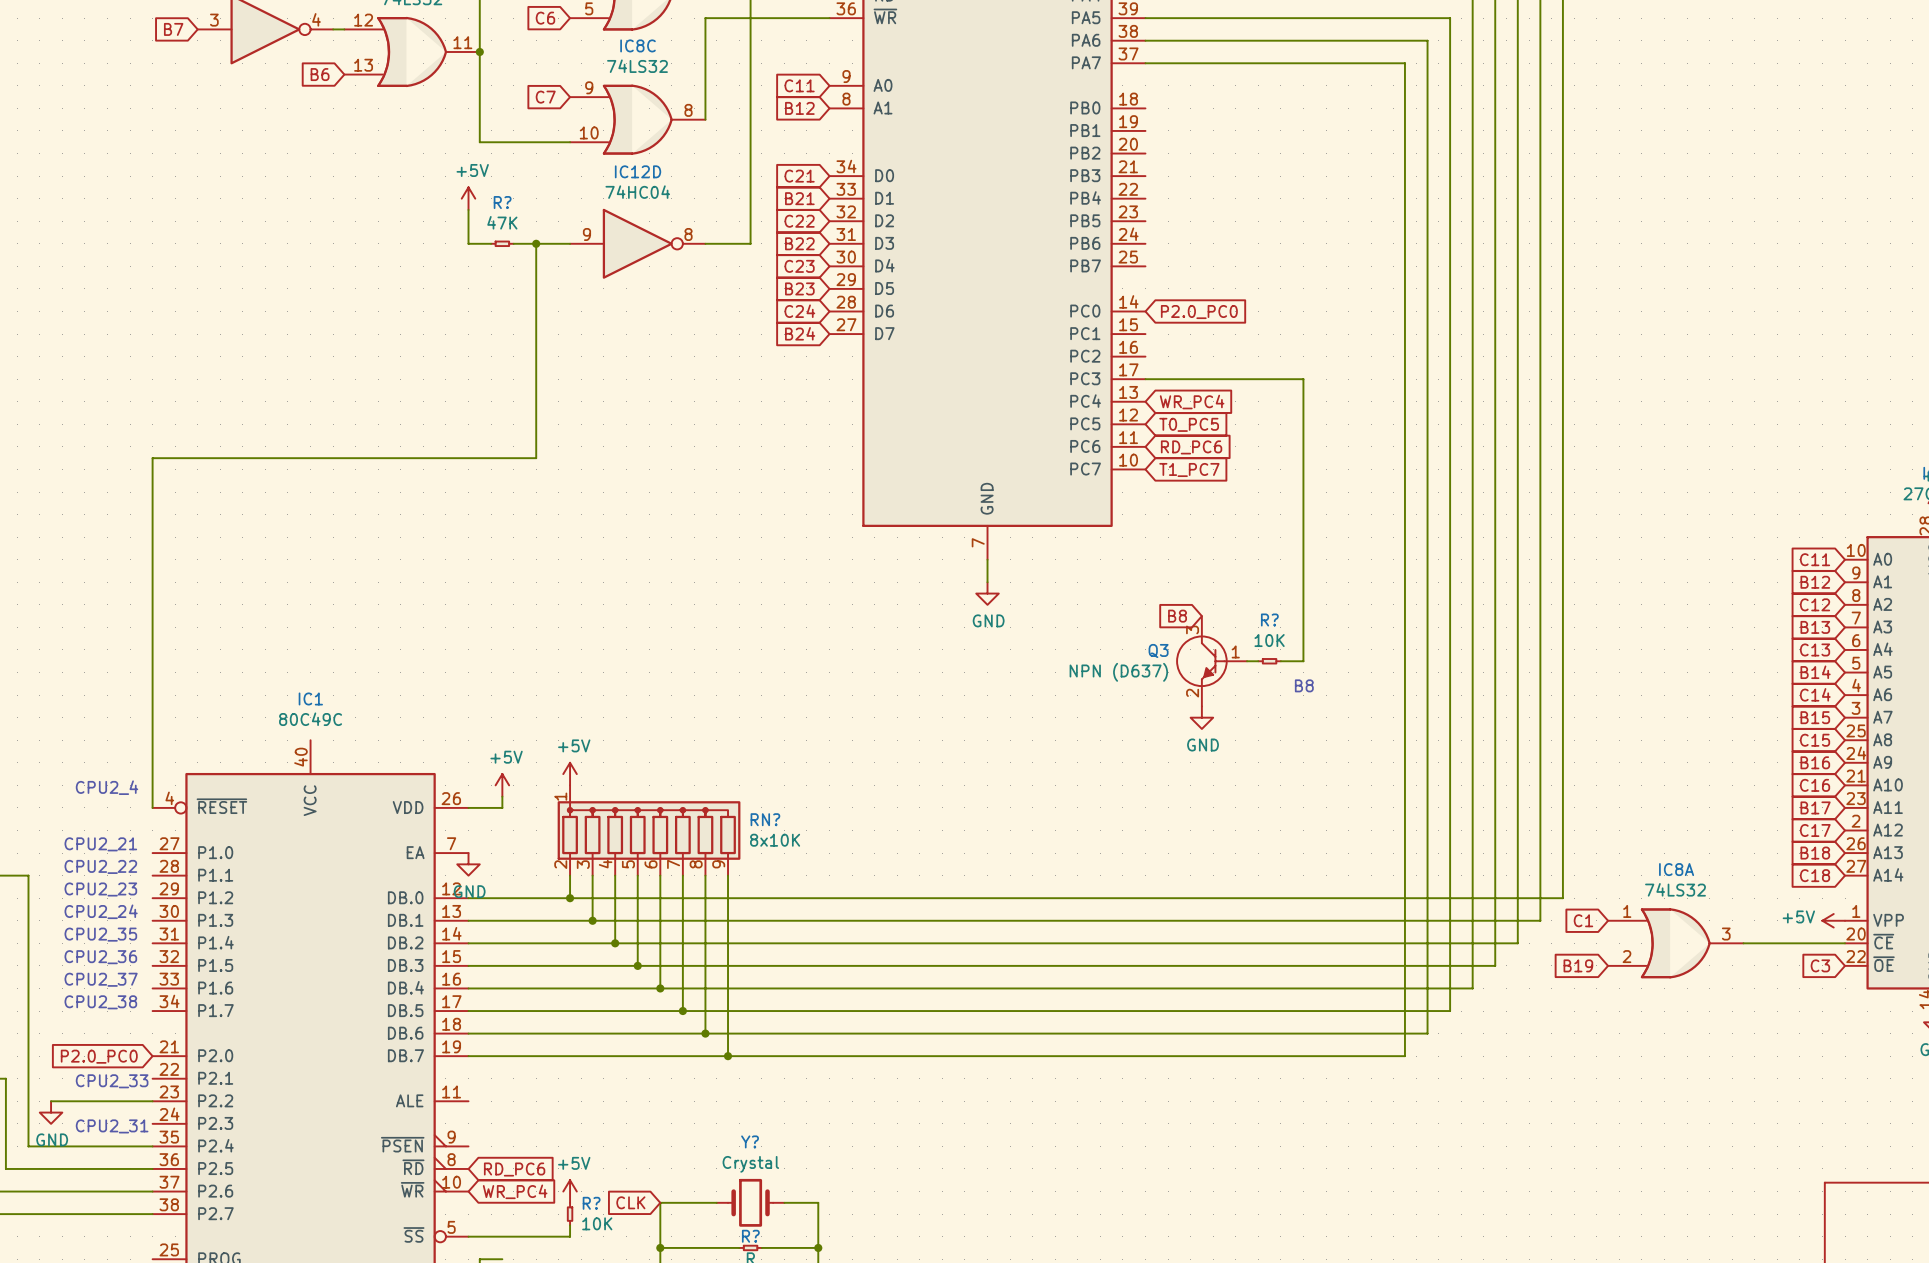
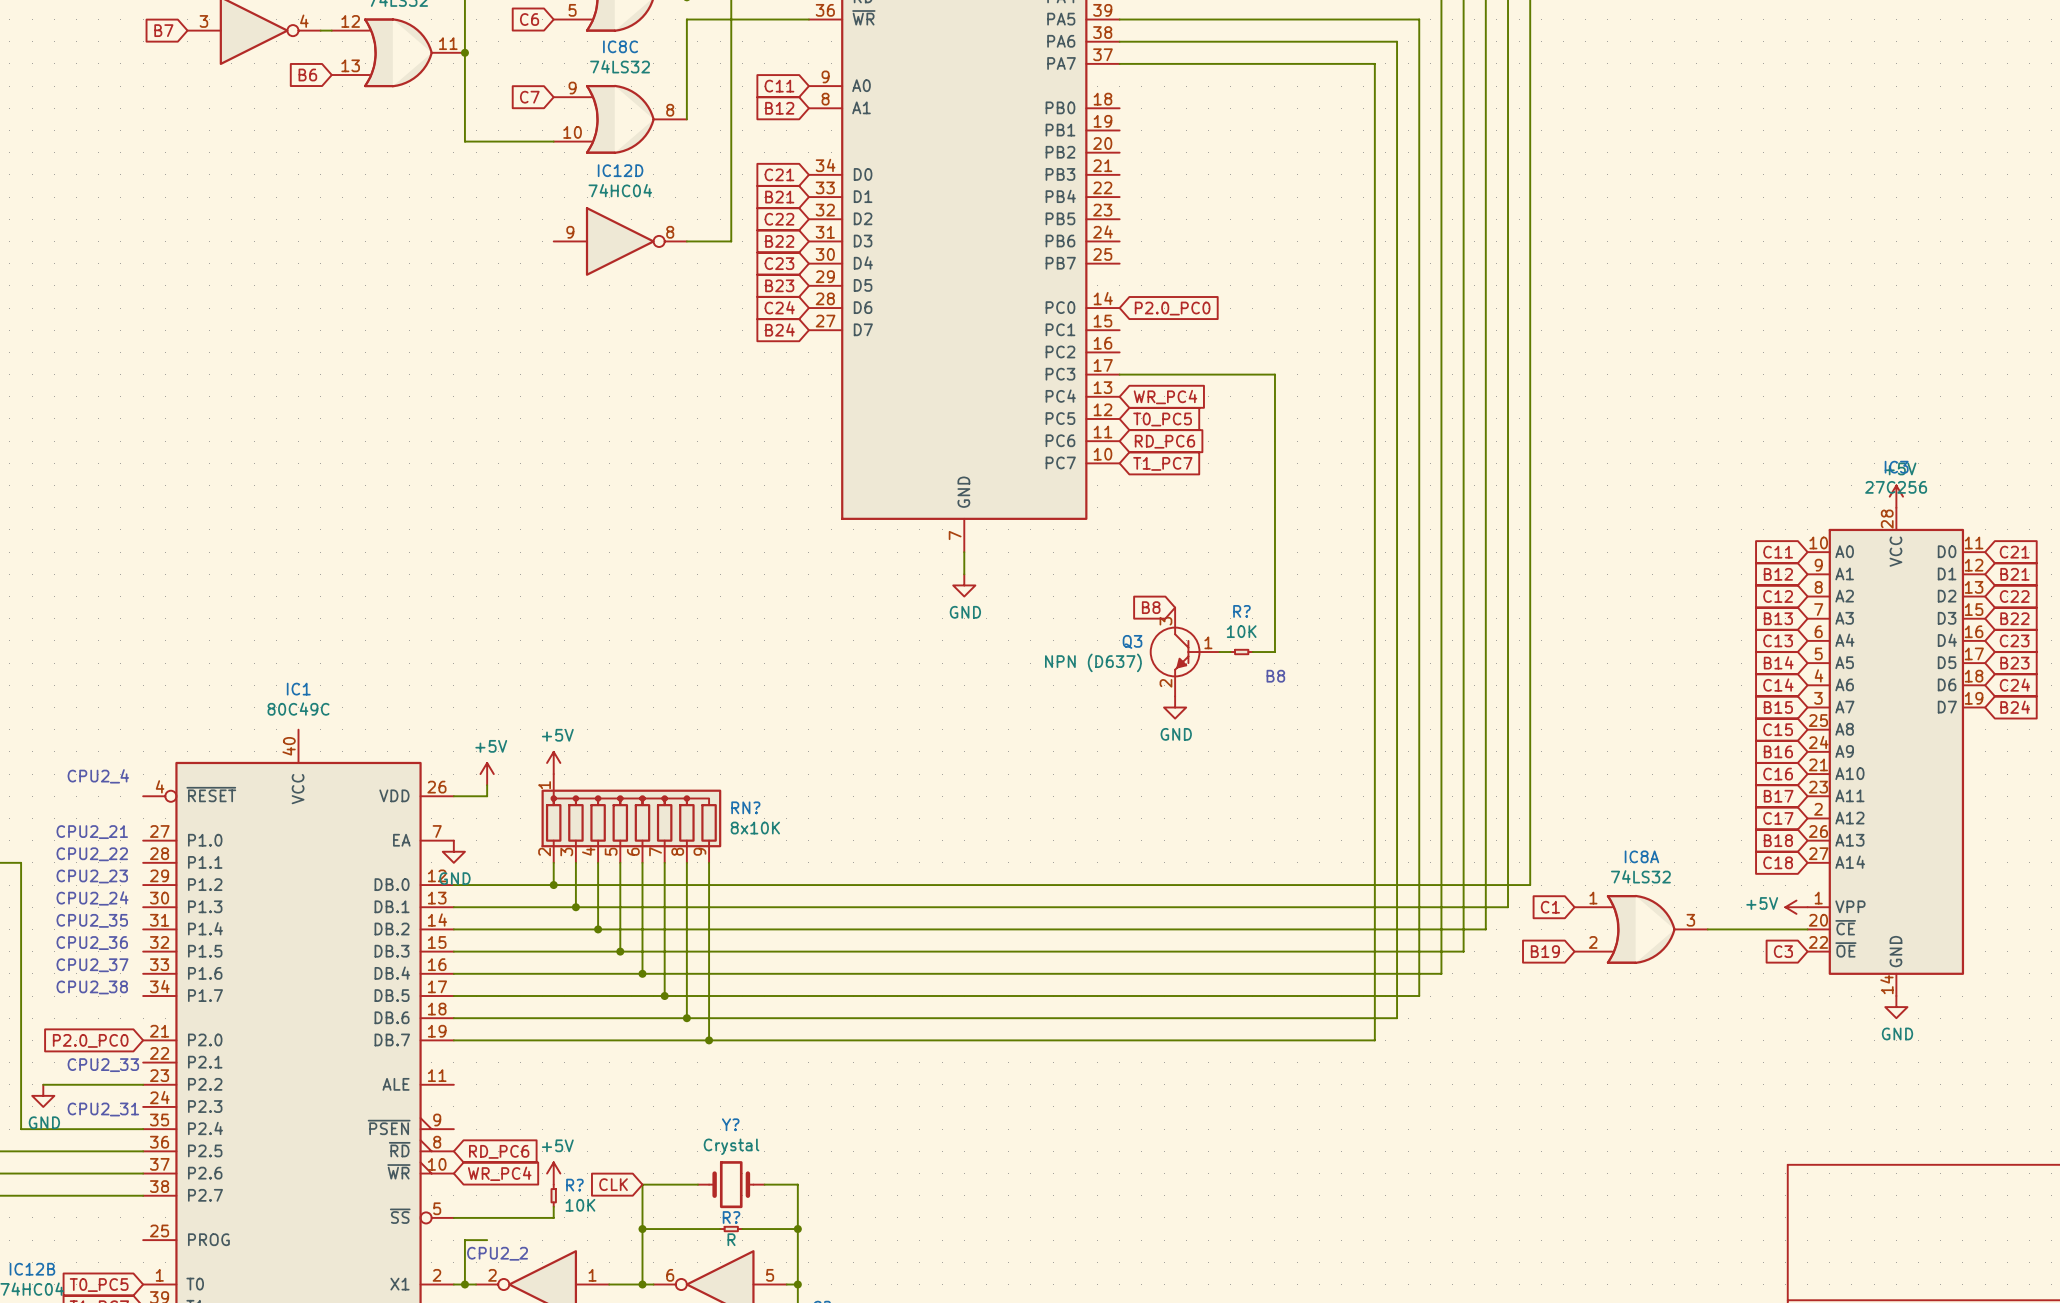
power symbol: +5V (468, 198) -> none
wire: (468, 209) (468, 243) (491, 243) -> none
R?: 47K (502, 243) -> none
wire: (513, 243) (570, 243) -> none
wire: (536, 243) (536, 458) (152, 458) (152, 807) -> none
junction: (536, 243) -> none

